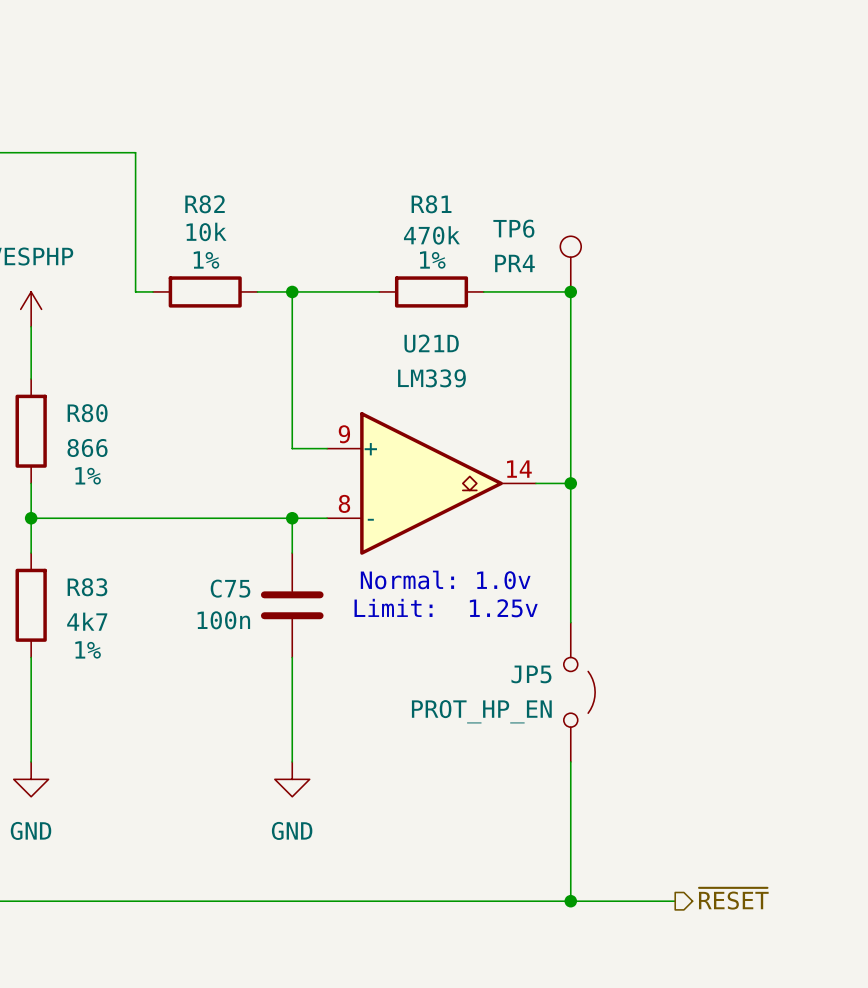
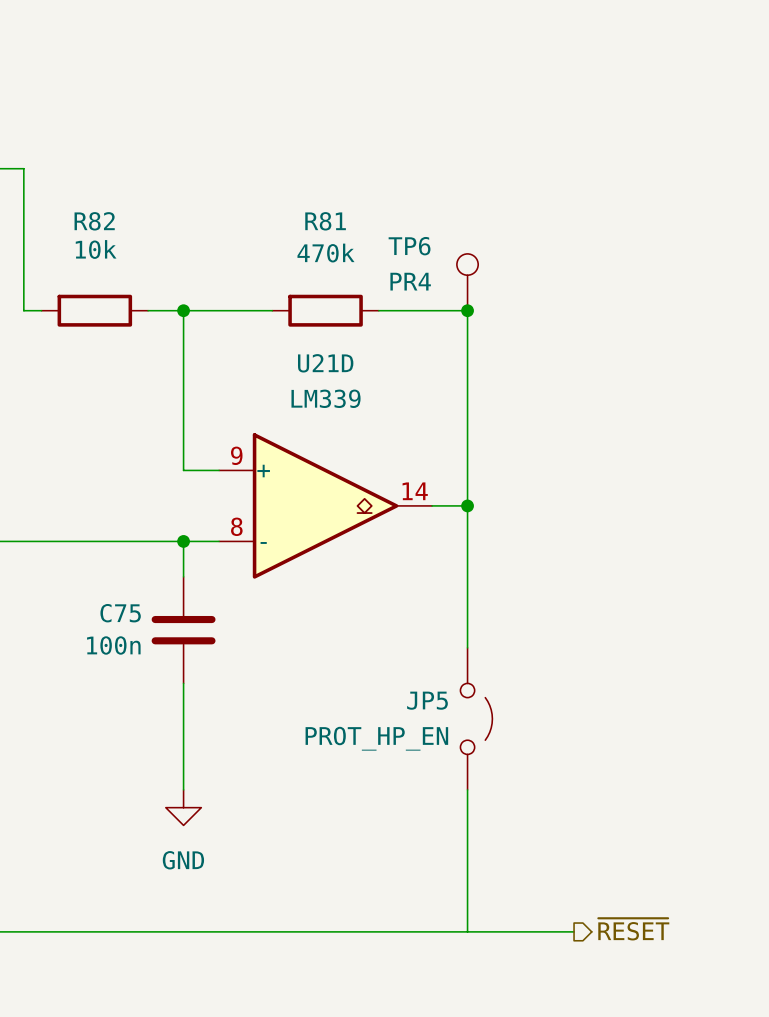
R82 text: 1% (206, 259) -> none
R81 text: 1% (432, 259) -> none
text: Normal: 1.0v (445, 579) -> none
text: Limit: 1.25v (446, 608) -> none
junction: (570, 901) -> none

